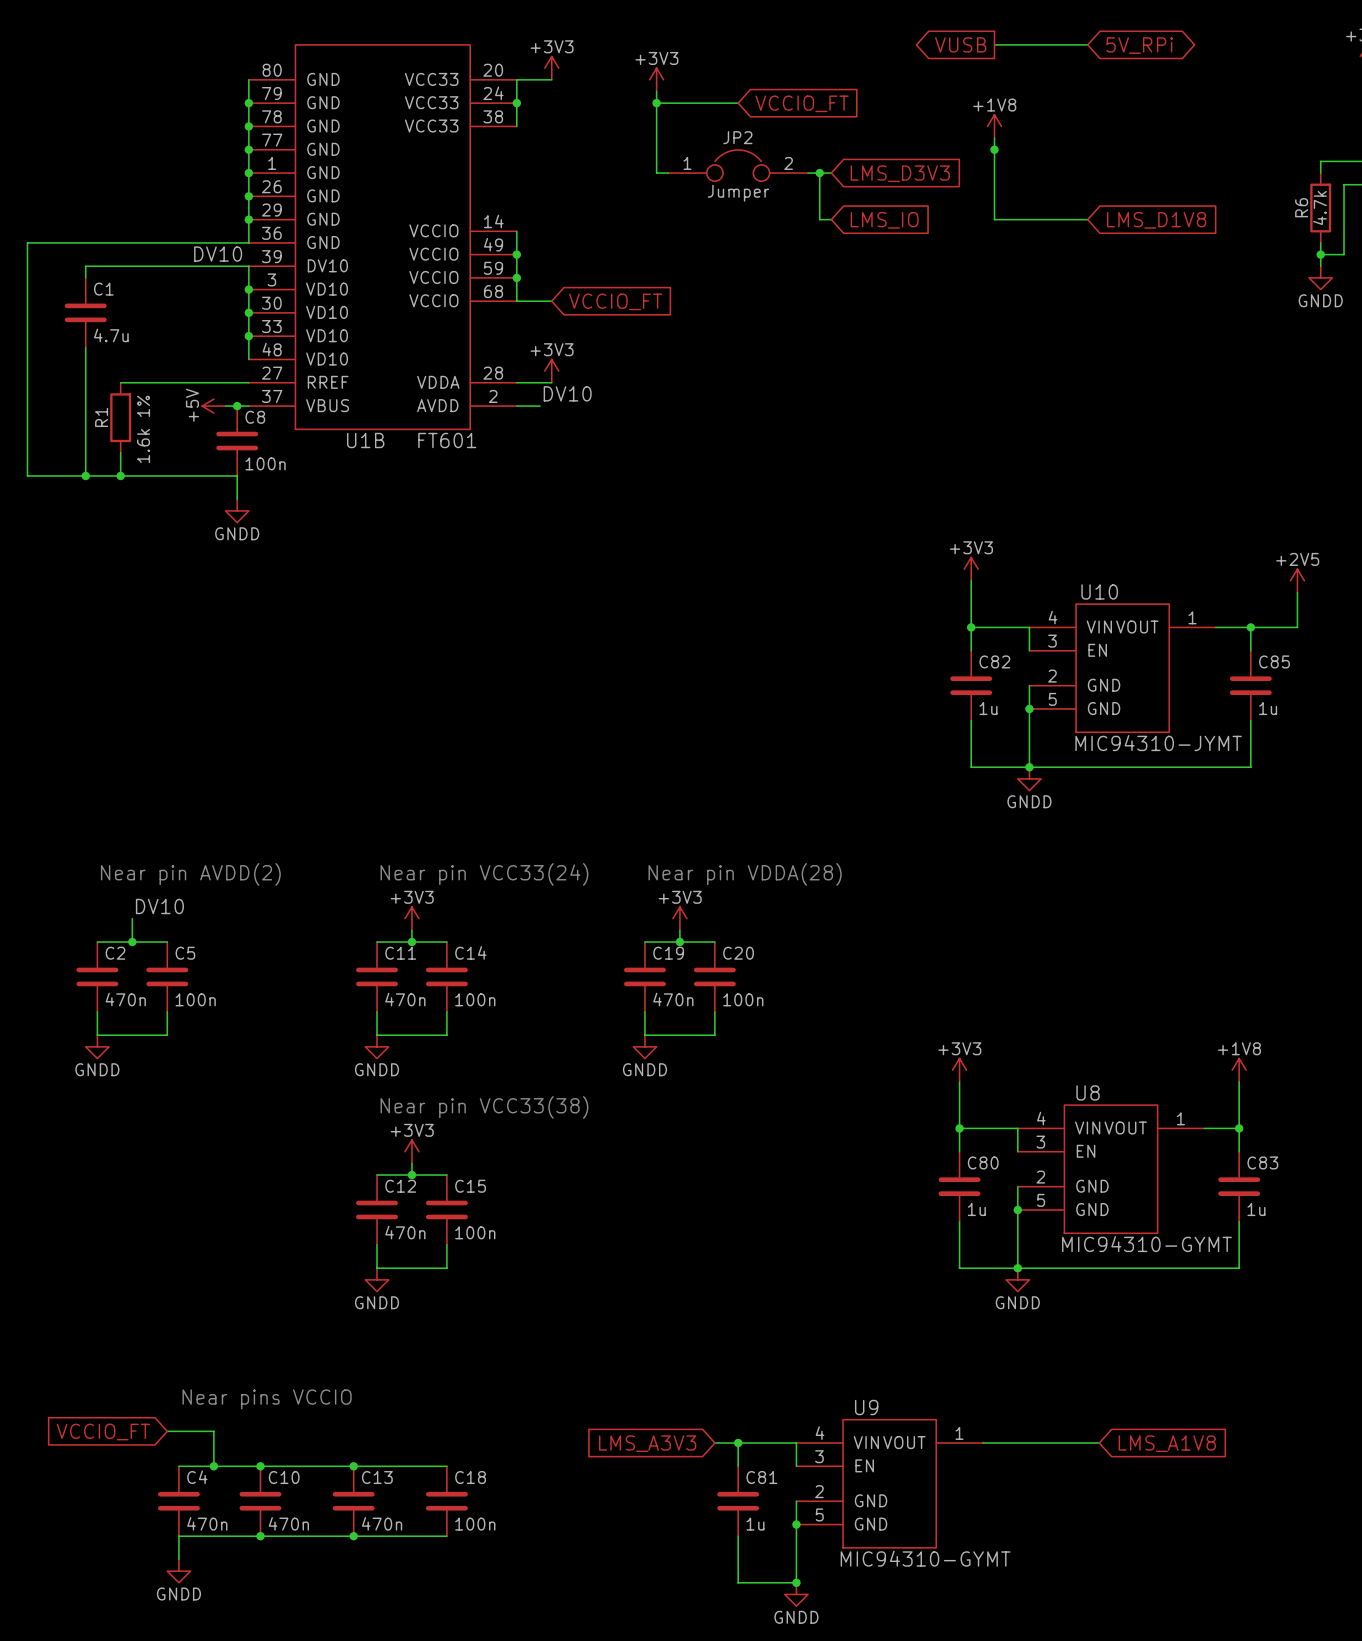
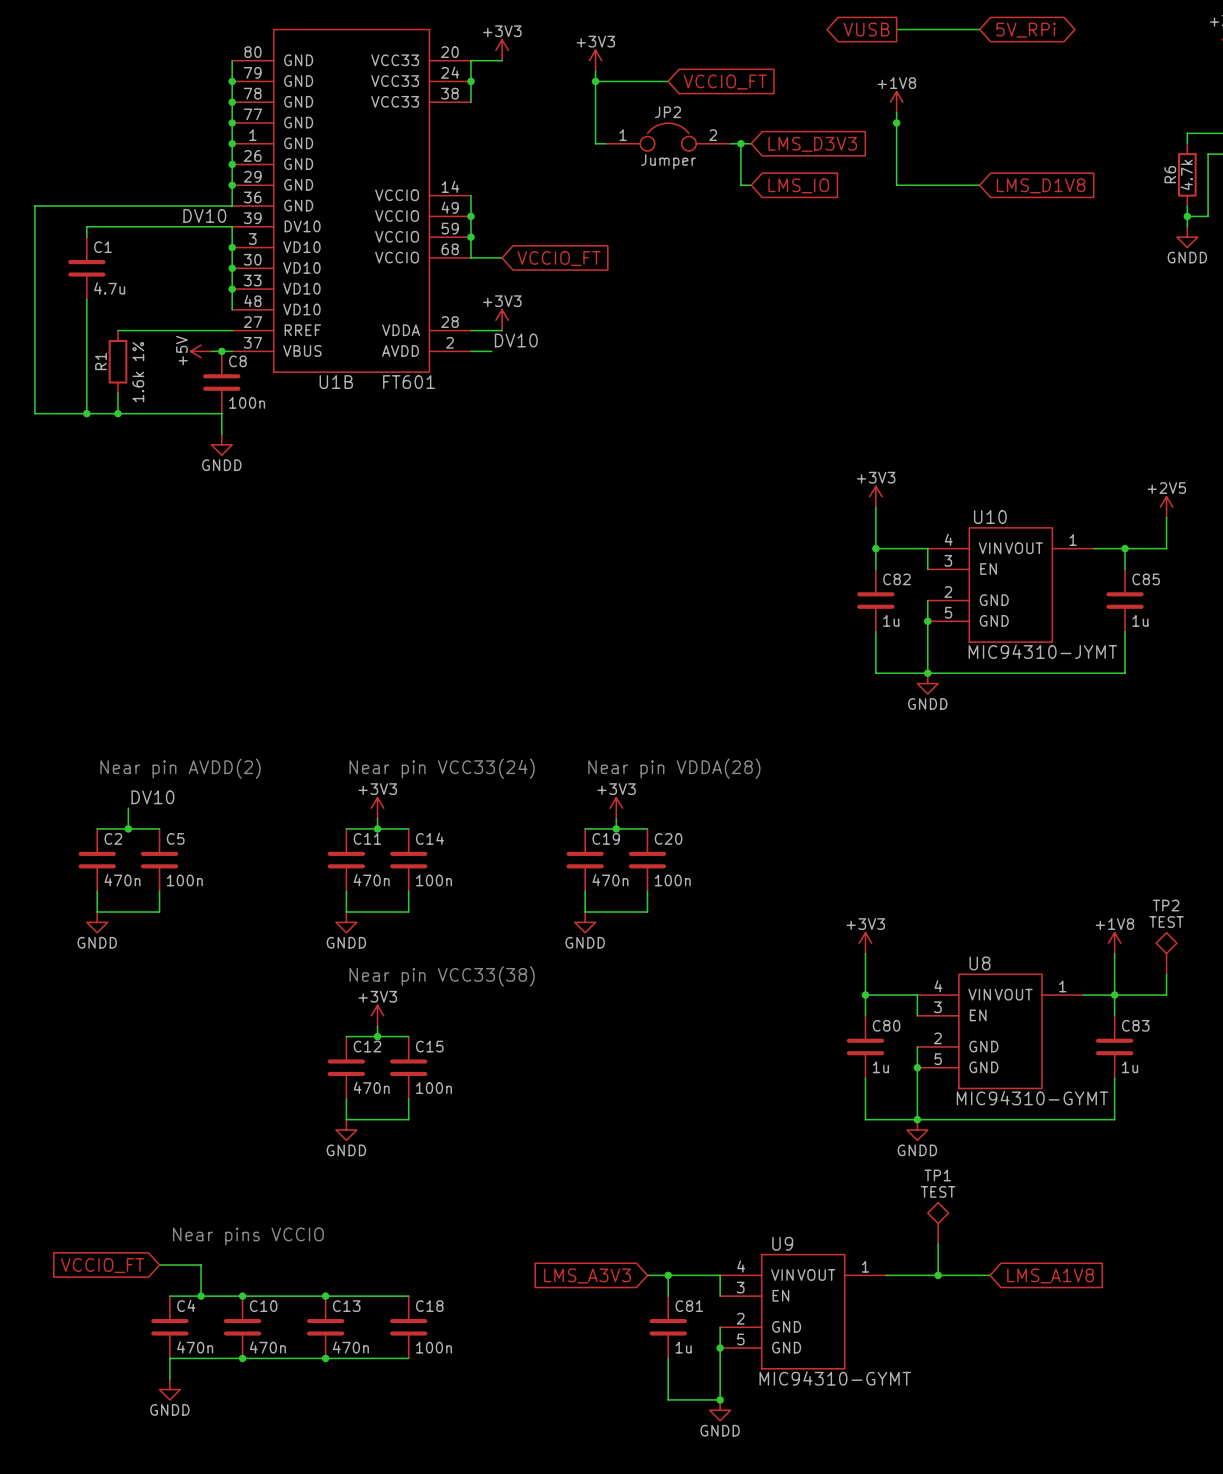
TP2: none -> TEST (1166, 953)
wire: none -> (1166, 974) (1166, 995) (1114, 995)
TP1: none -> TEST (938, 1223)
wire: none -> (938, 1244) (938, 1275)
junction: none -> (938, 1275)

